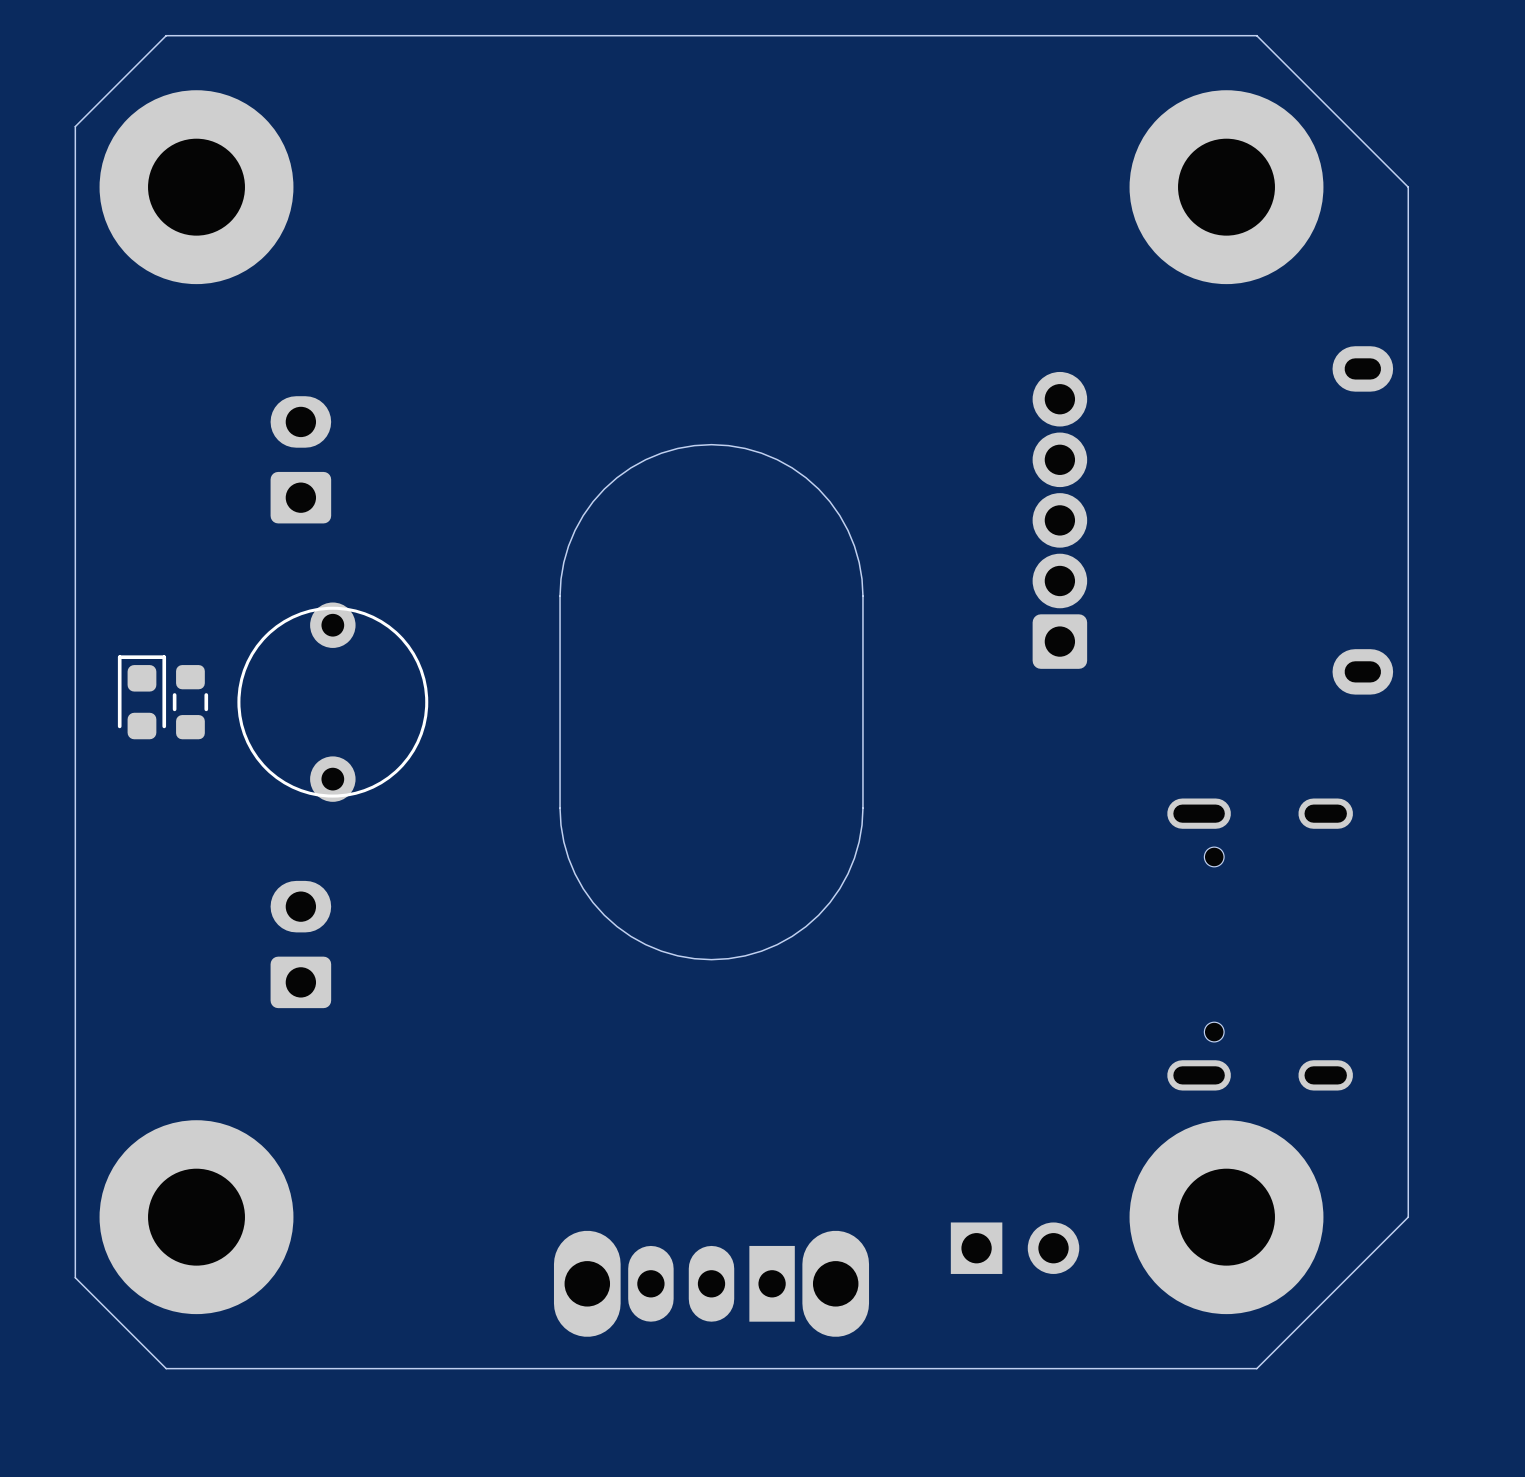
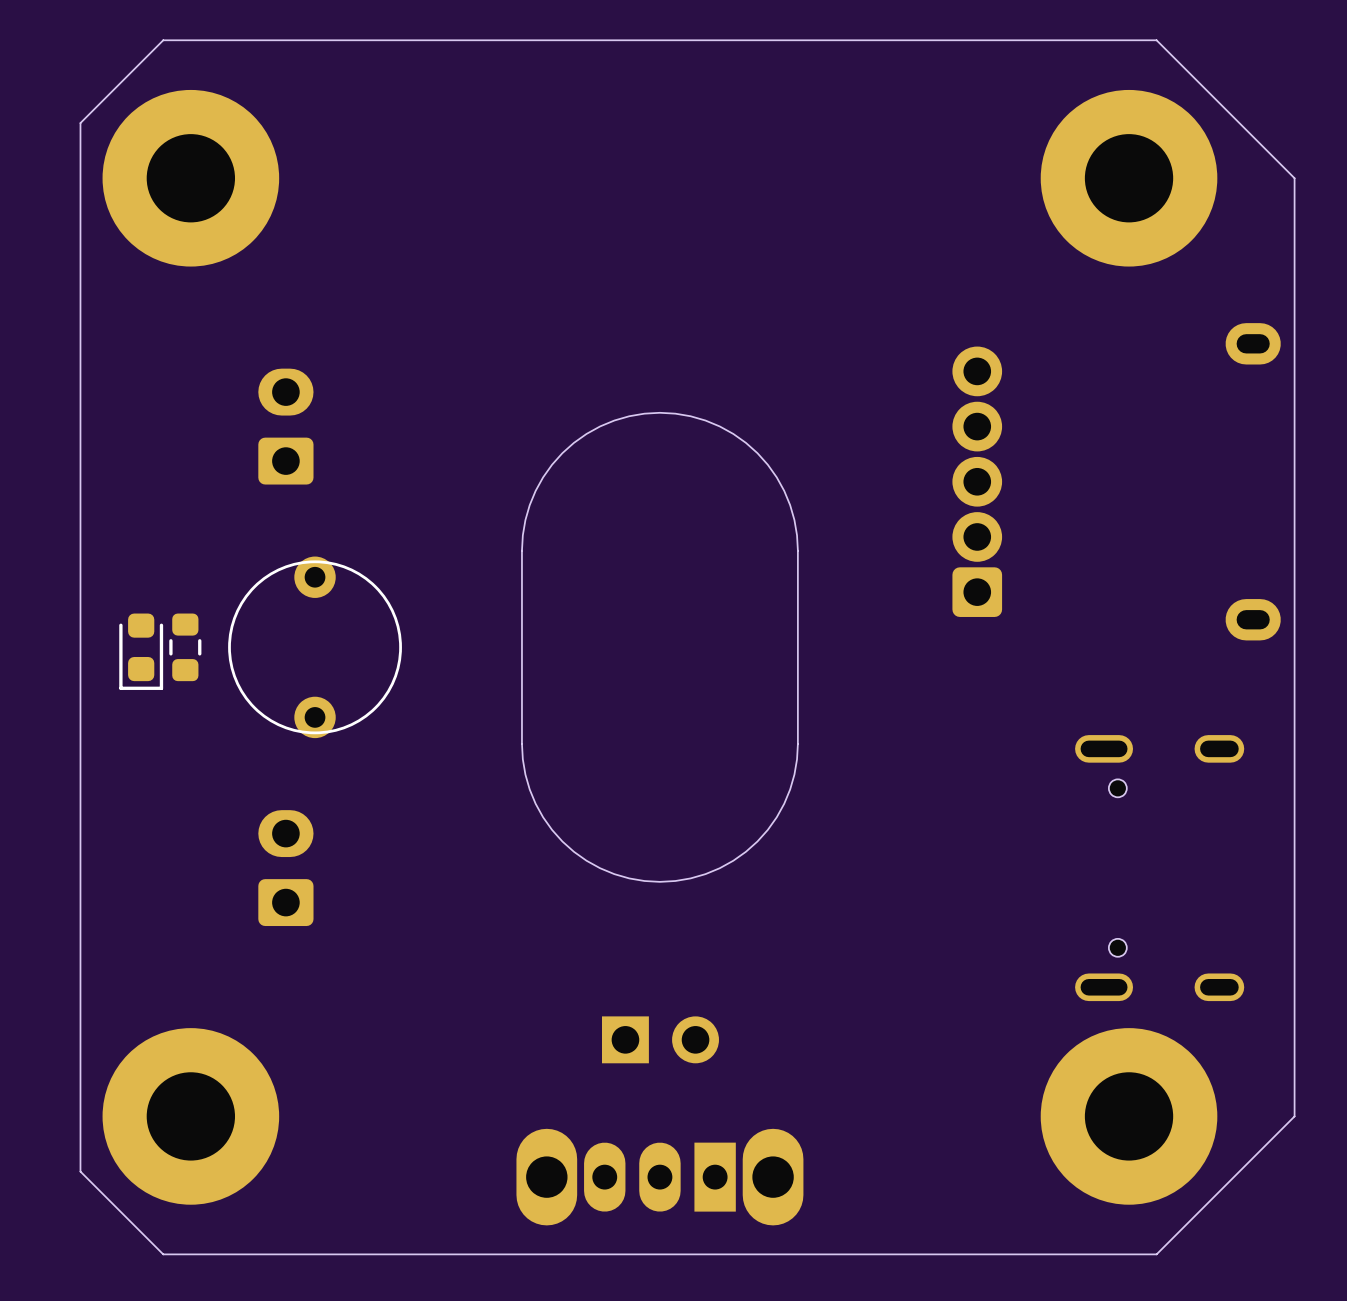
part rotation: 0° (141, 697) -> 180° (141, 651)
part position: (1015, 1248) -> (660, 1039)

